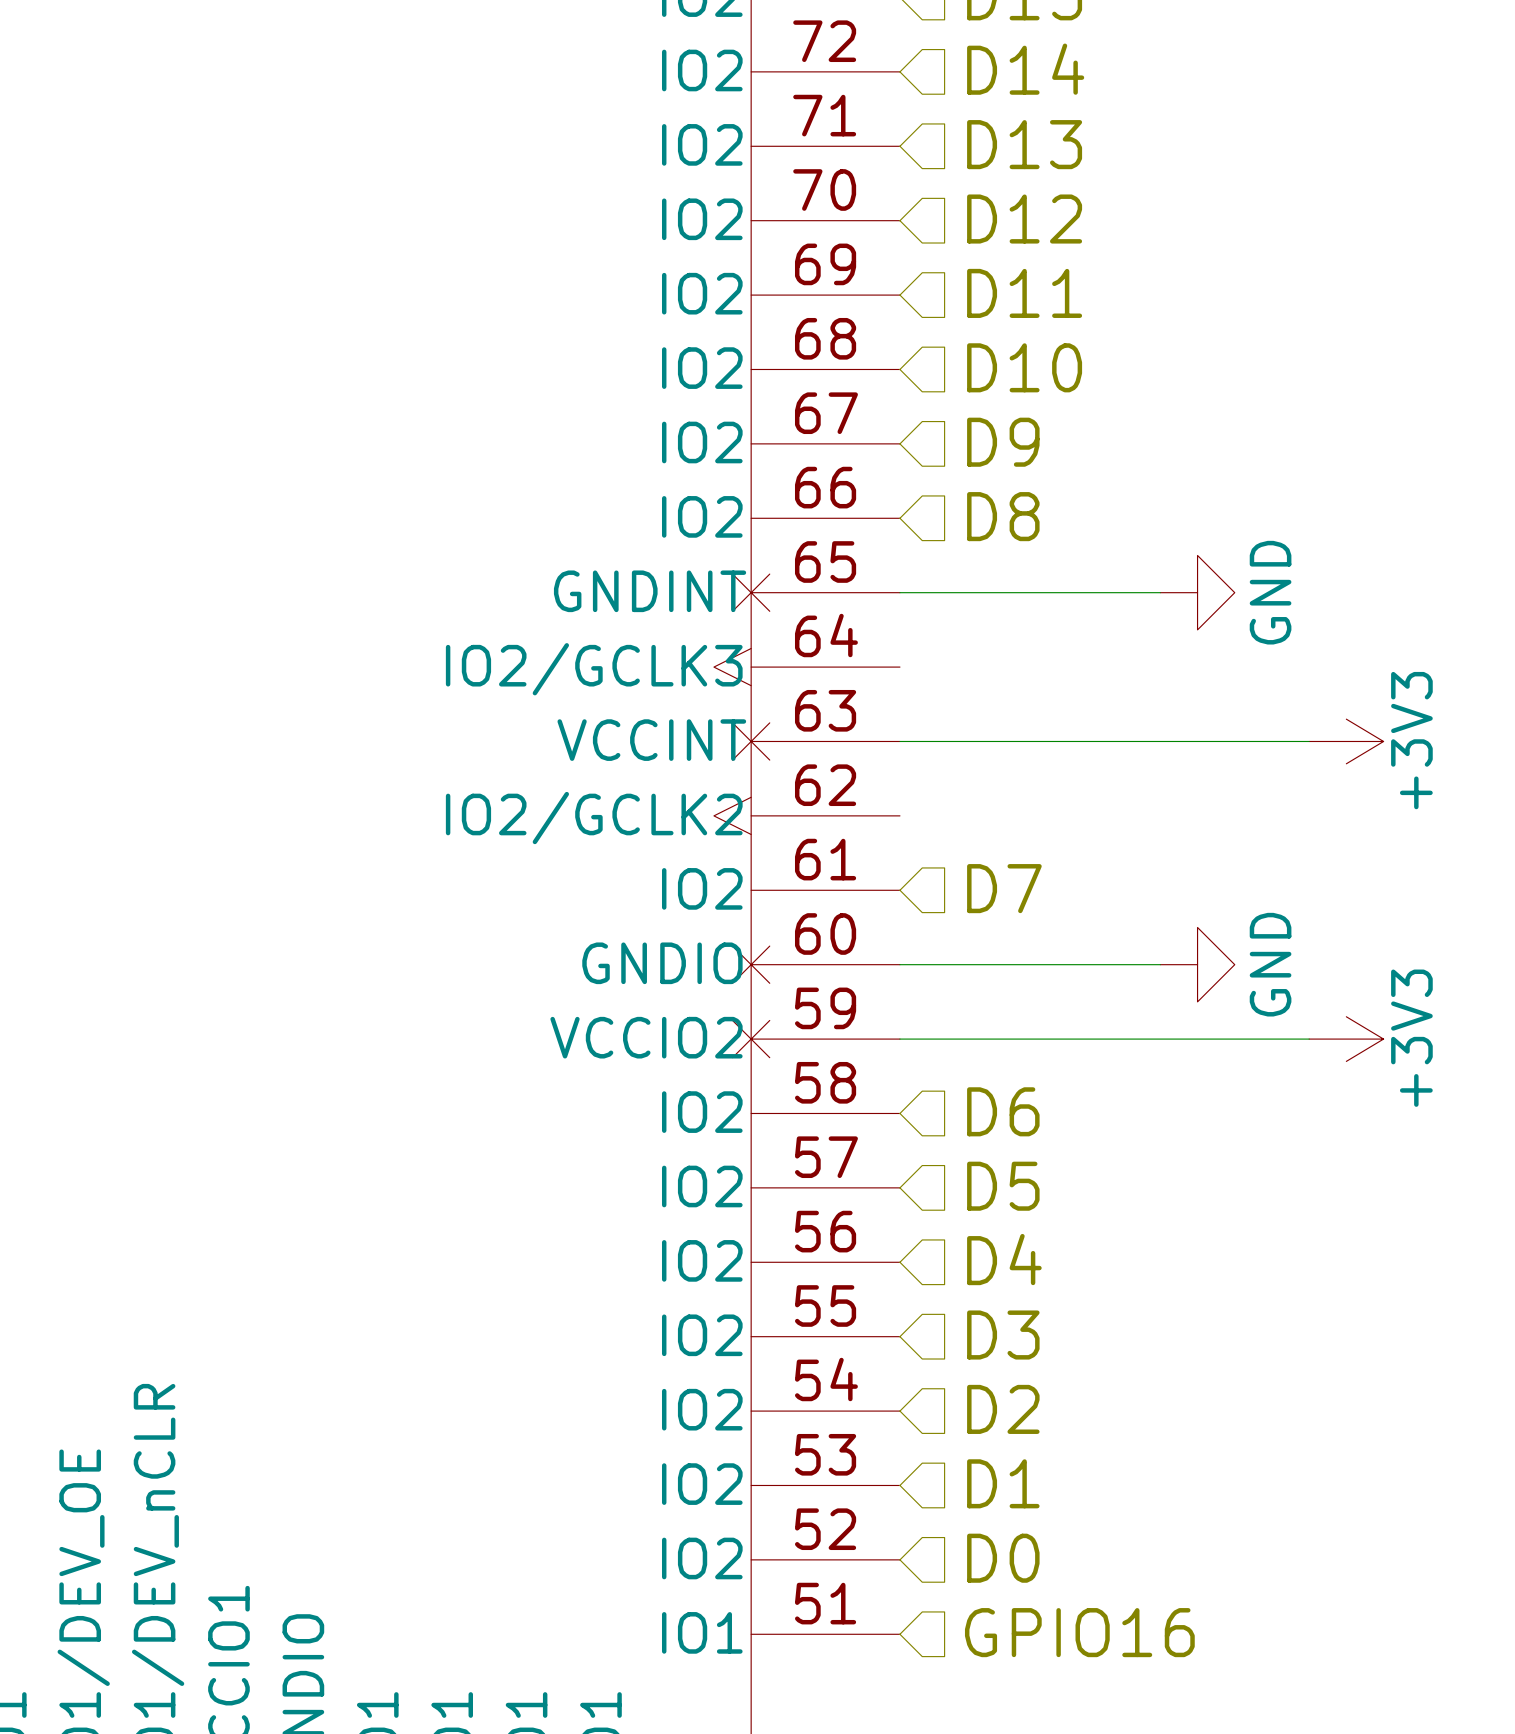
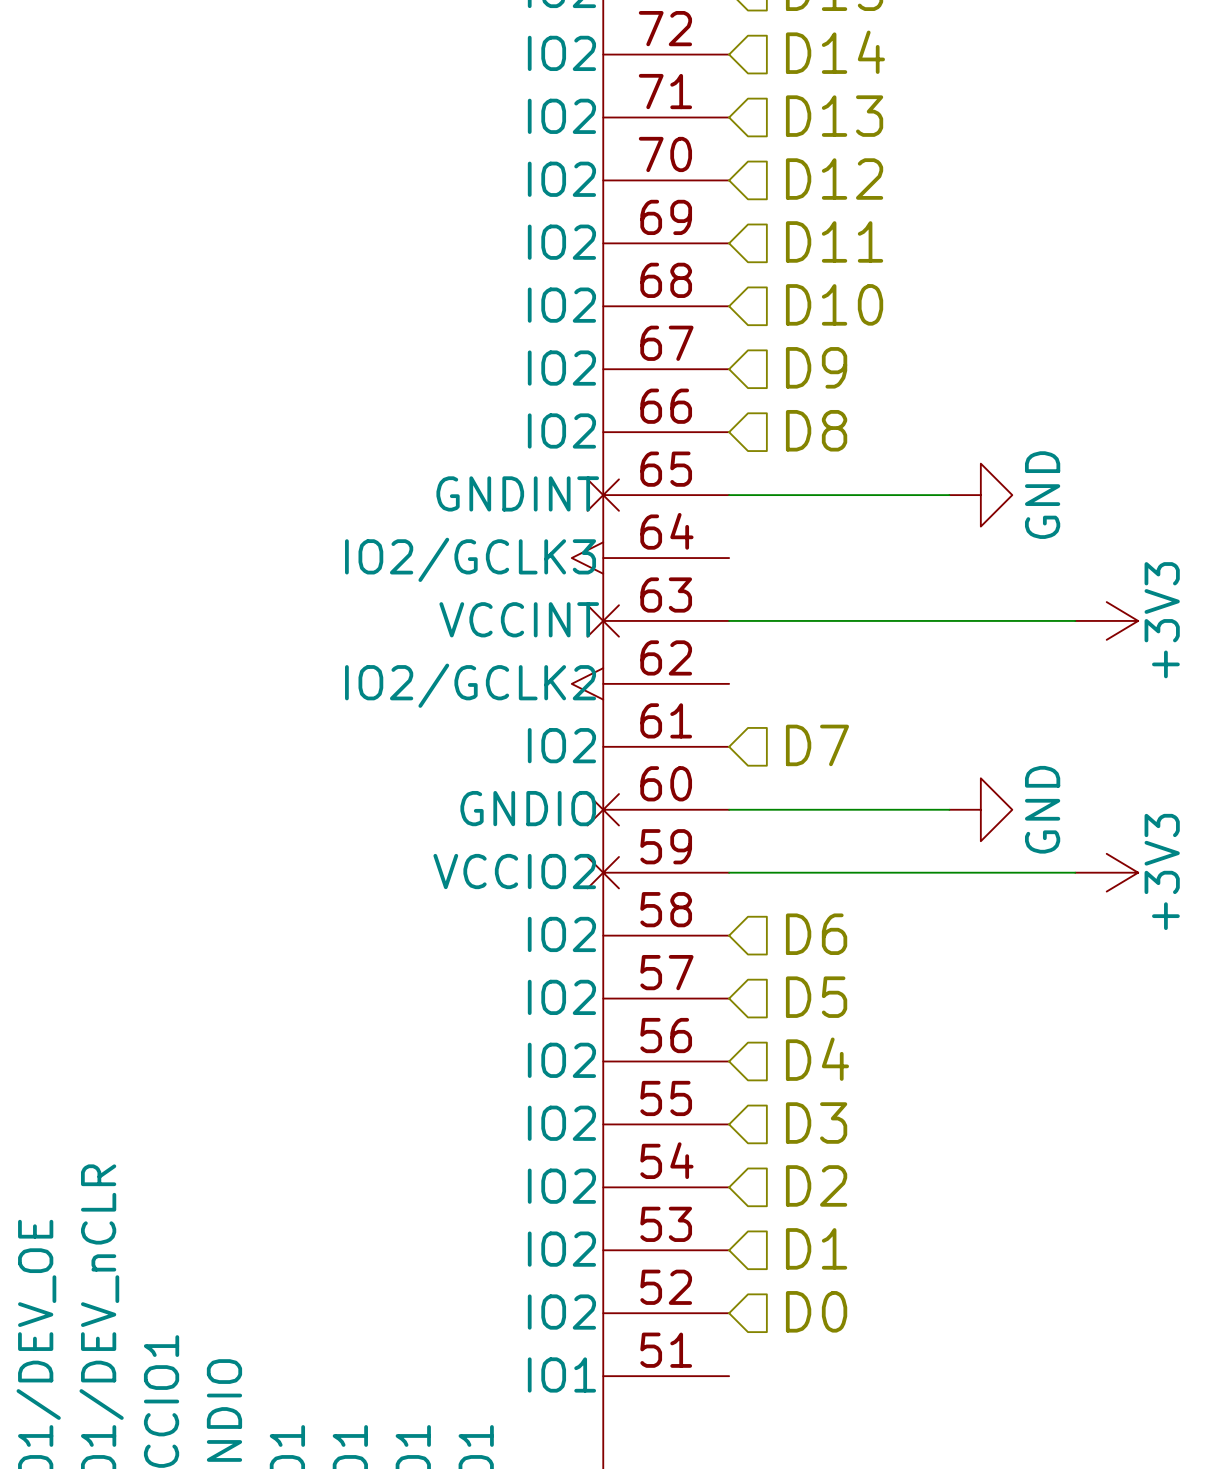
hierarchical label: GPIO16 (1079, 1632) -> none

